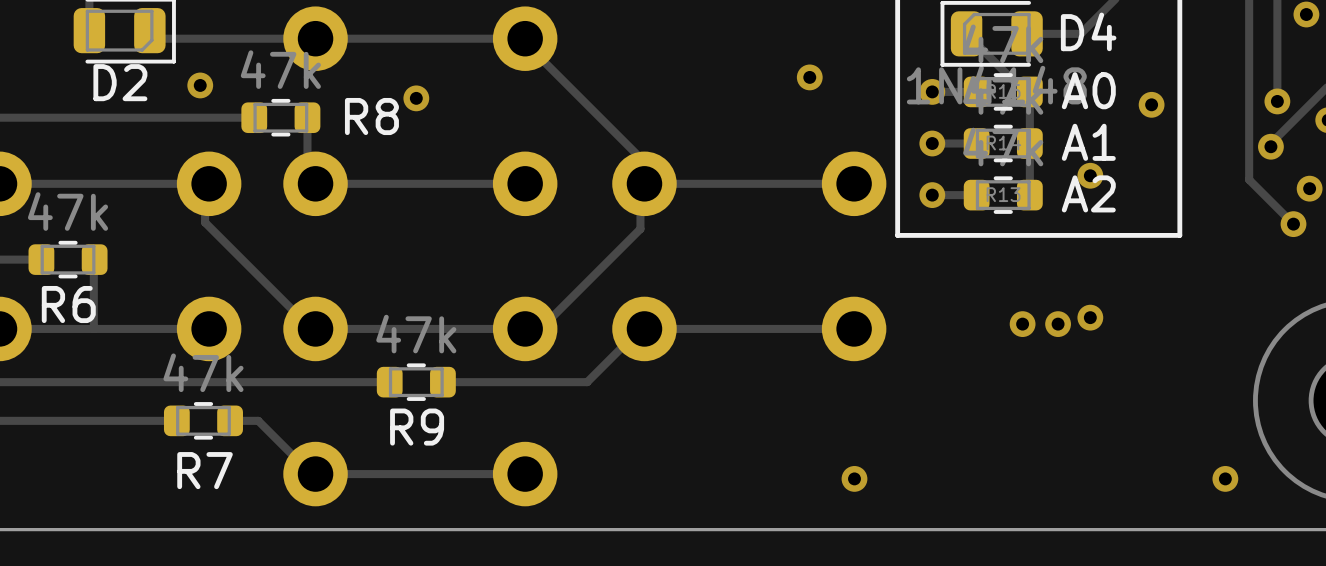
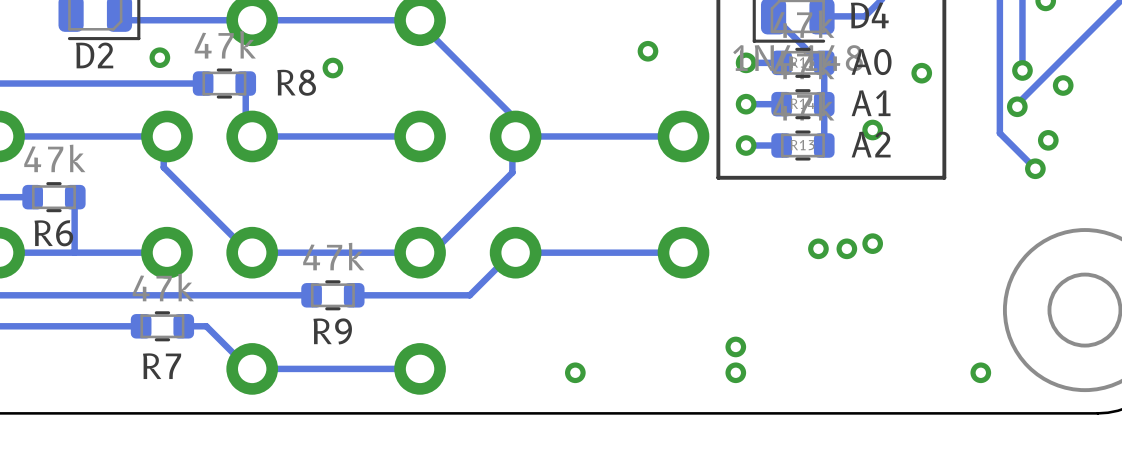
via: none -> (735, 346)
via: none -> (575, 372)
via: (854, 478) -> none
via: none -> (735, 372)

